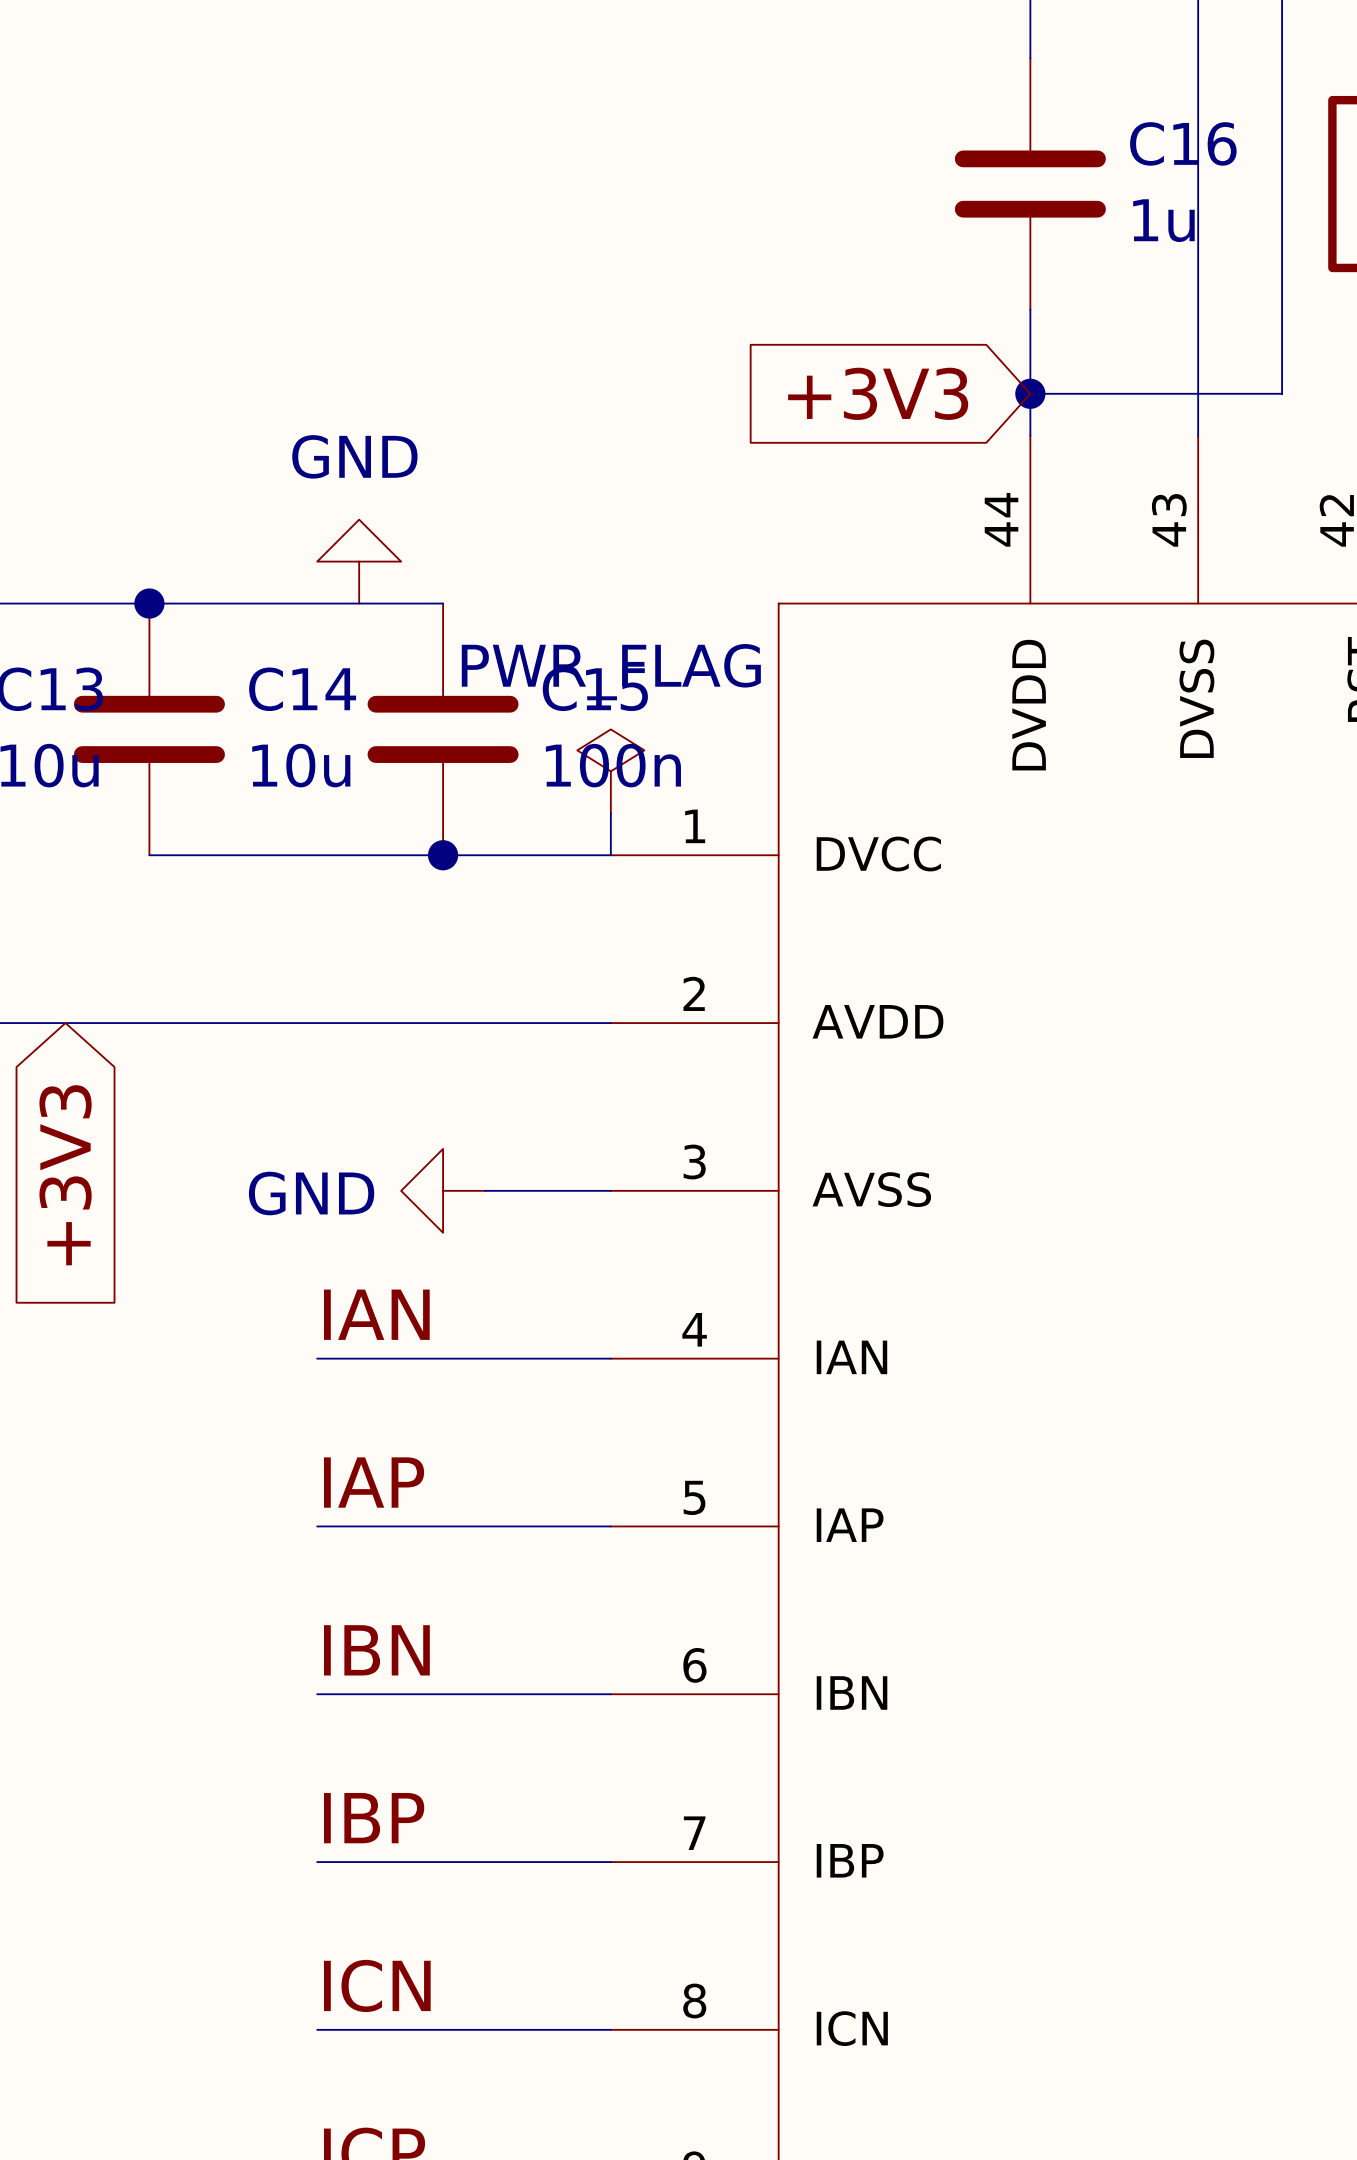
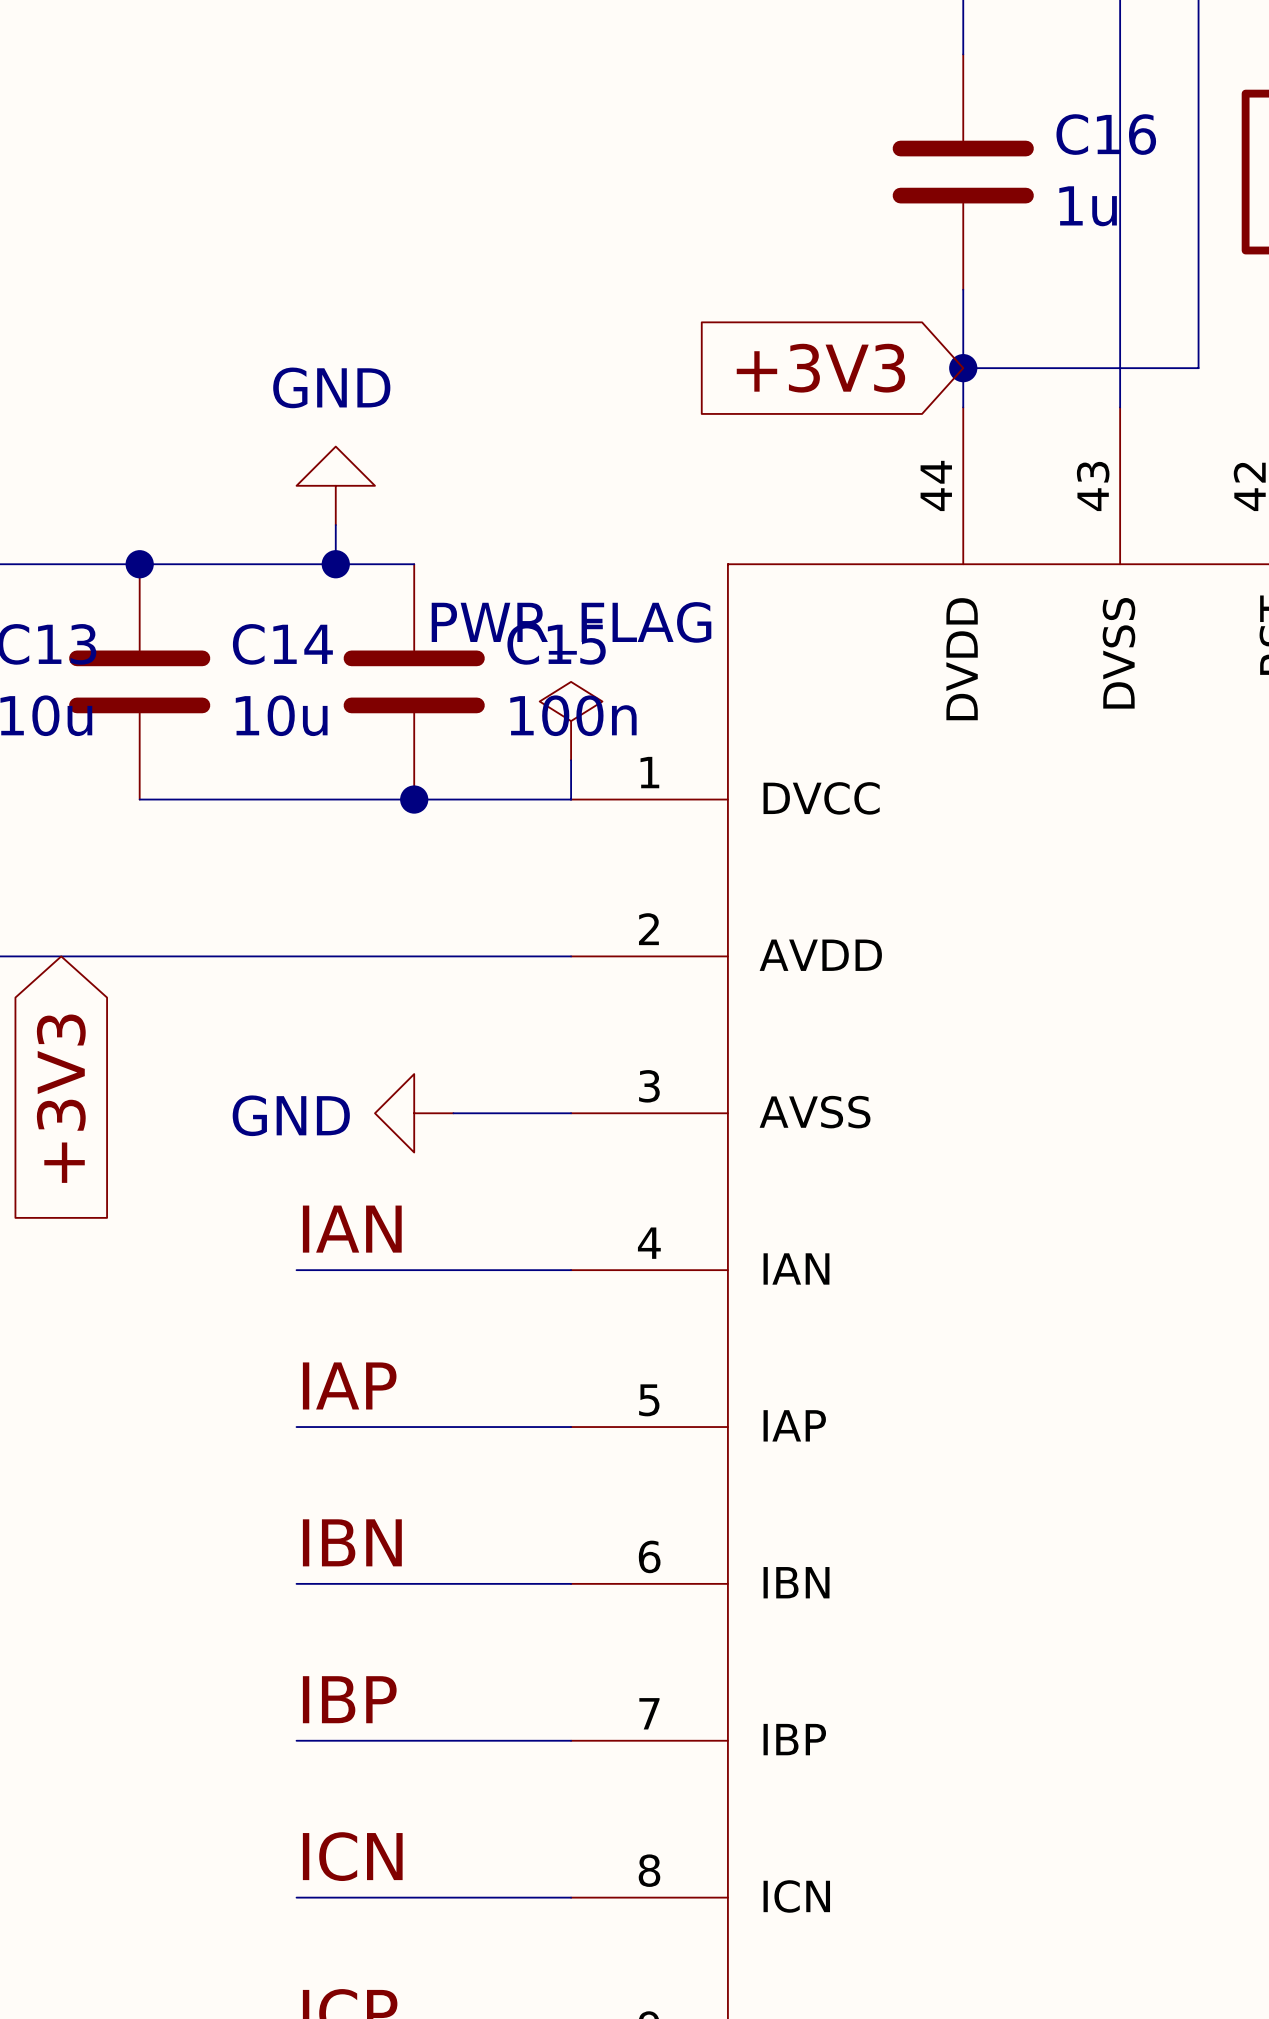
power symbol position: GND (359, 561) -> GND (335, 485)
junction: none -> (335, 564)

